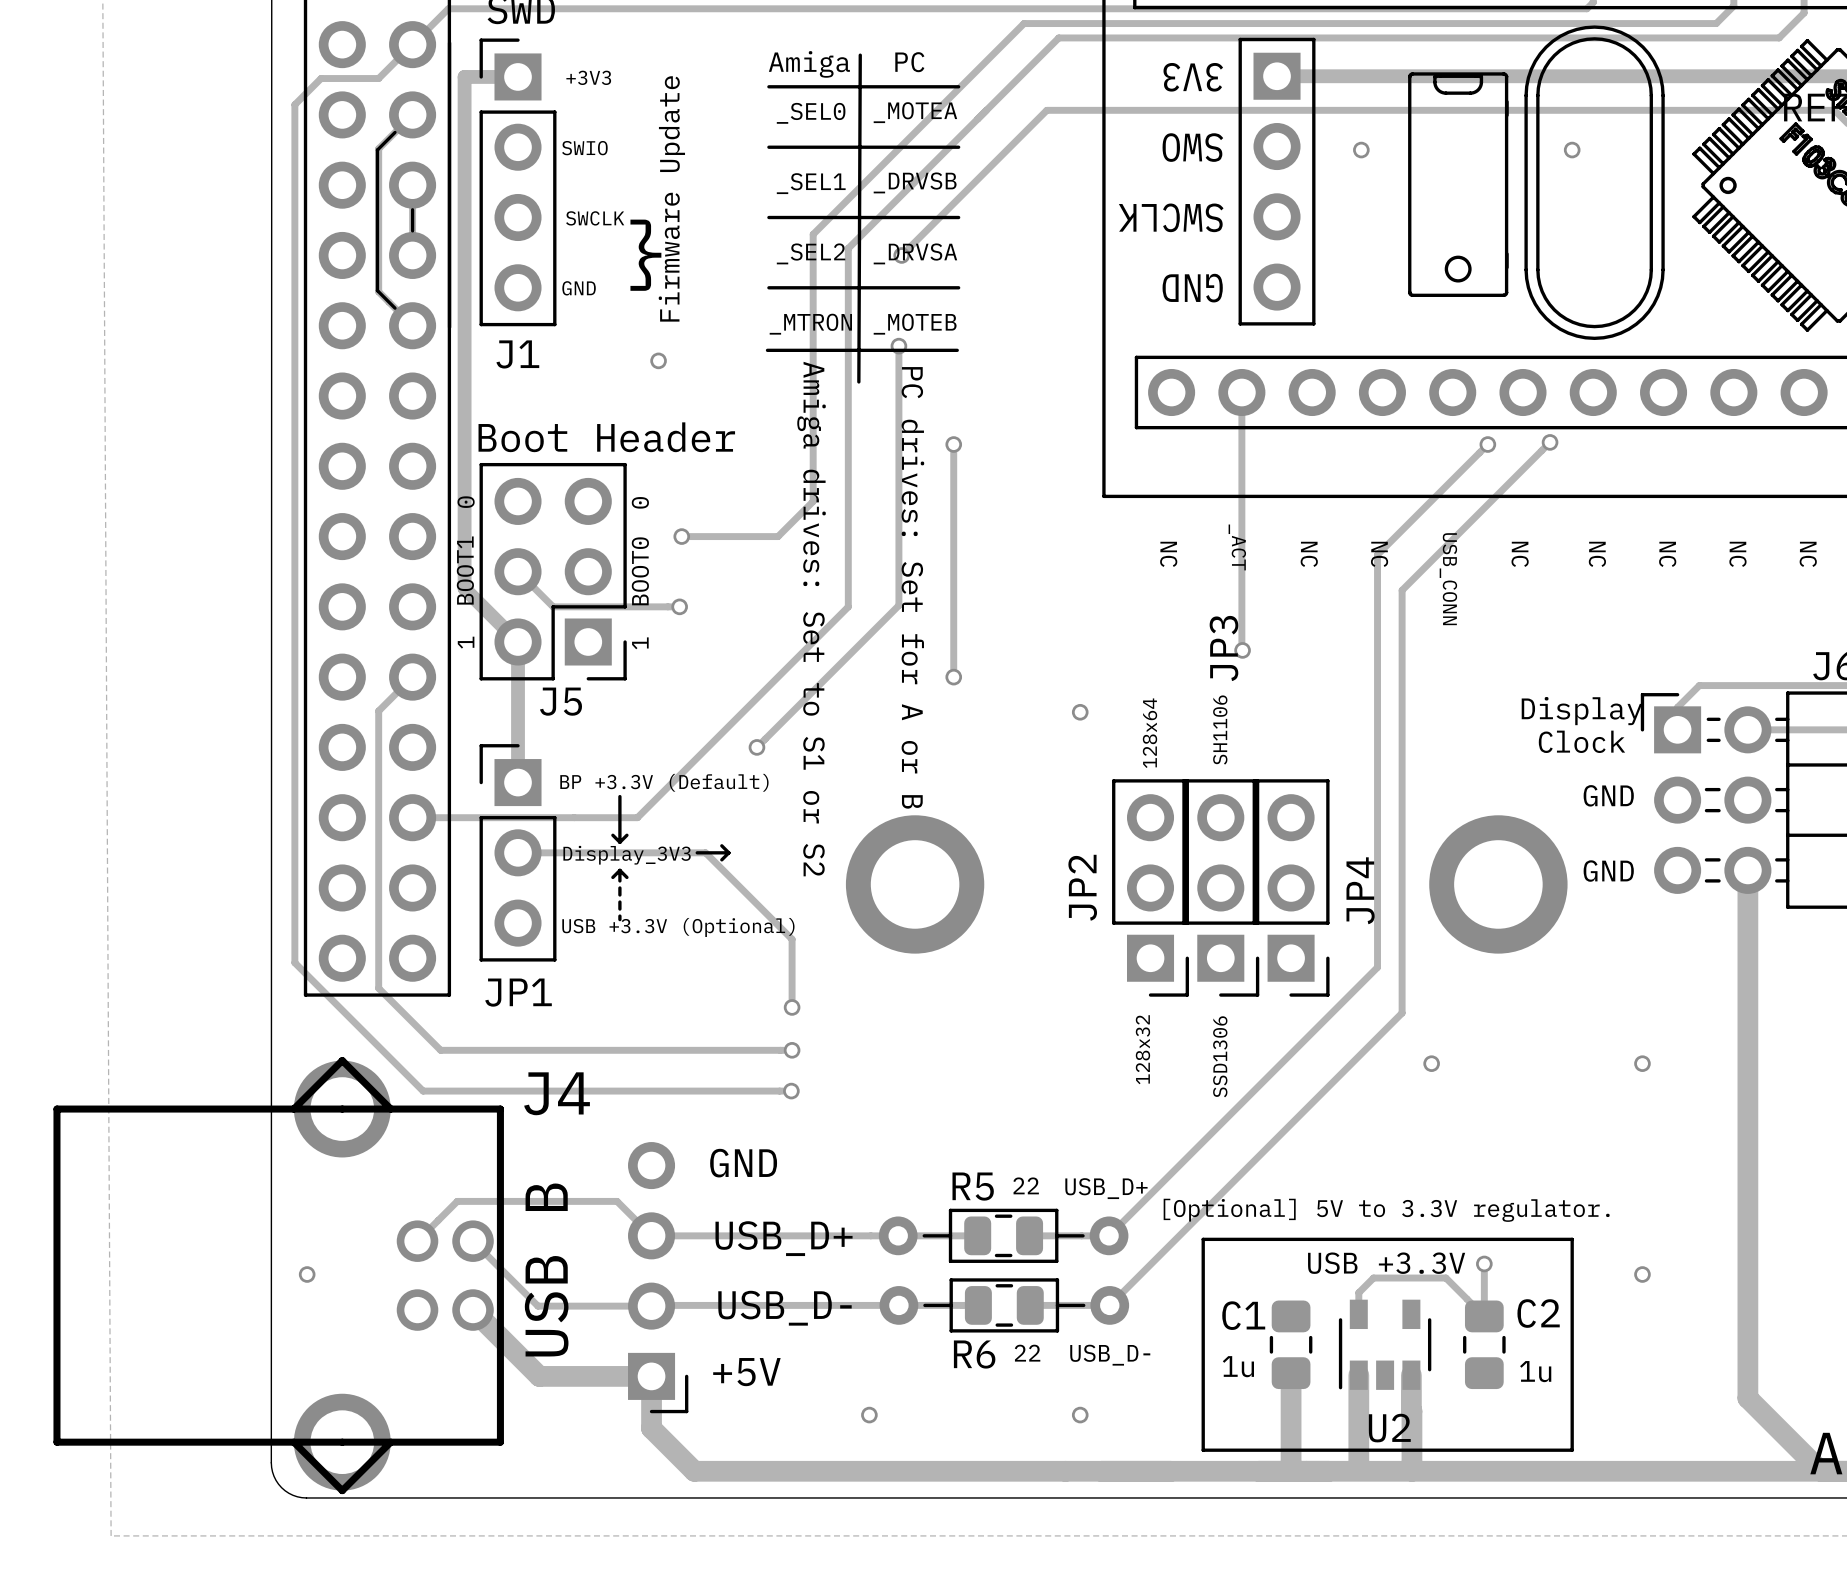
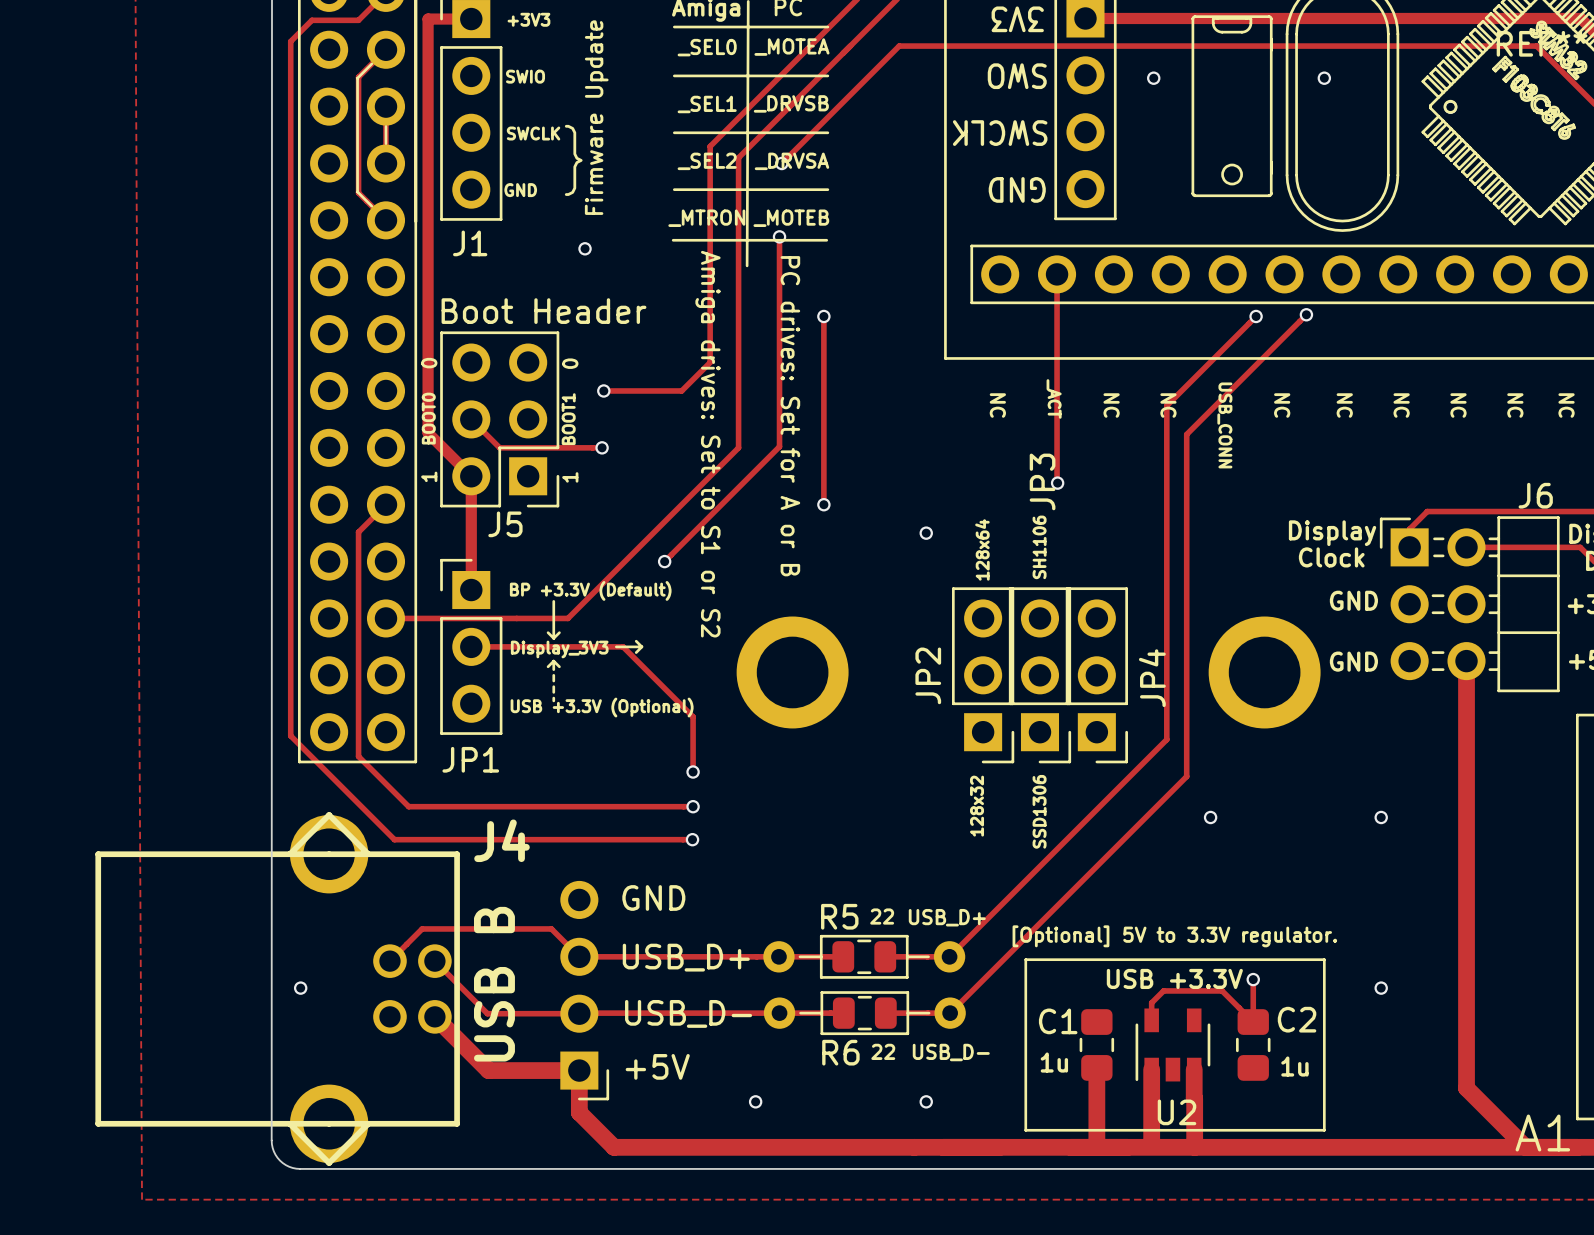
text: BOOT1 (465, 570) -> BOOT0 (428, 418)
text: BOOT0 (640, 571) -> BOOT1 (568, 419)

